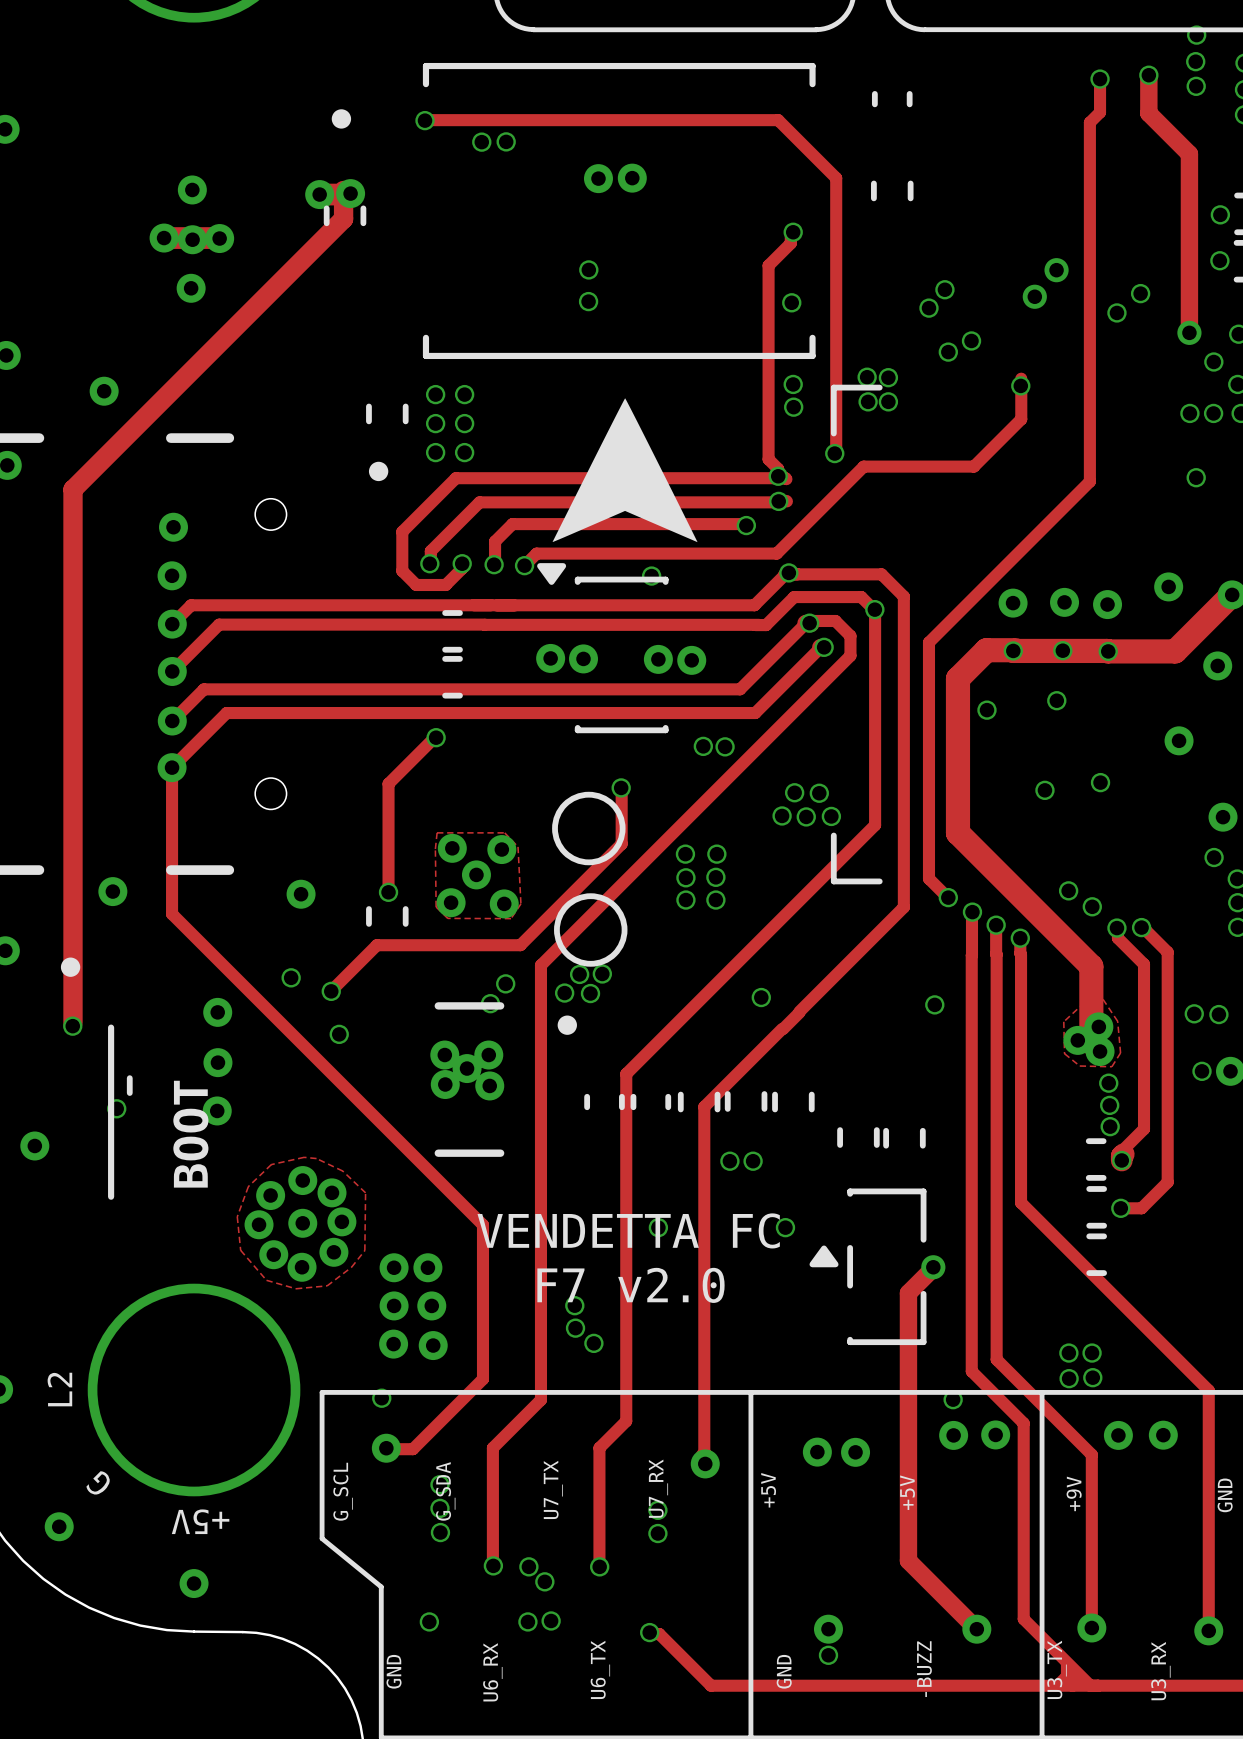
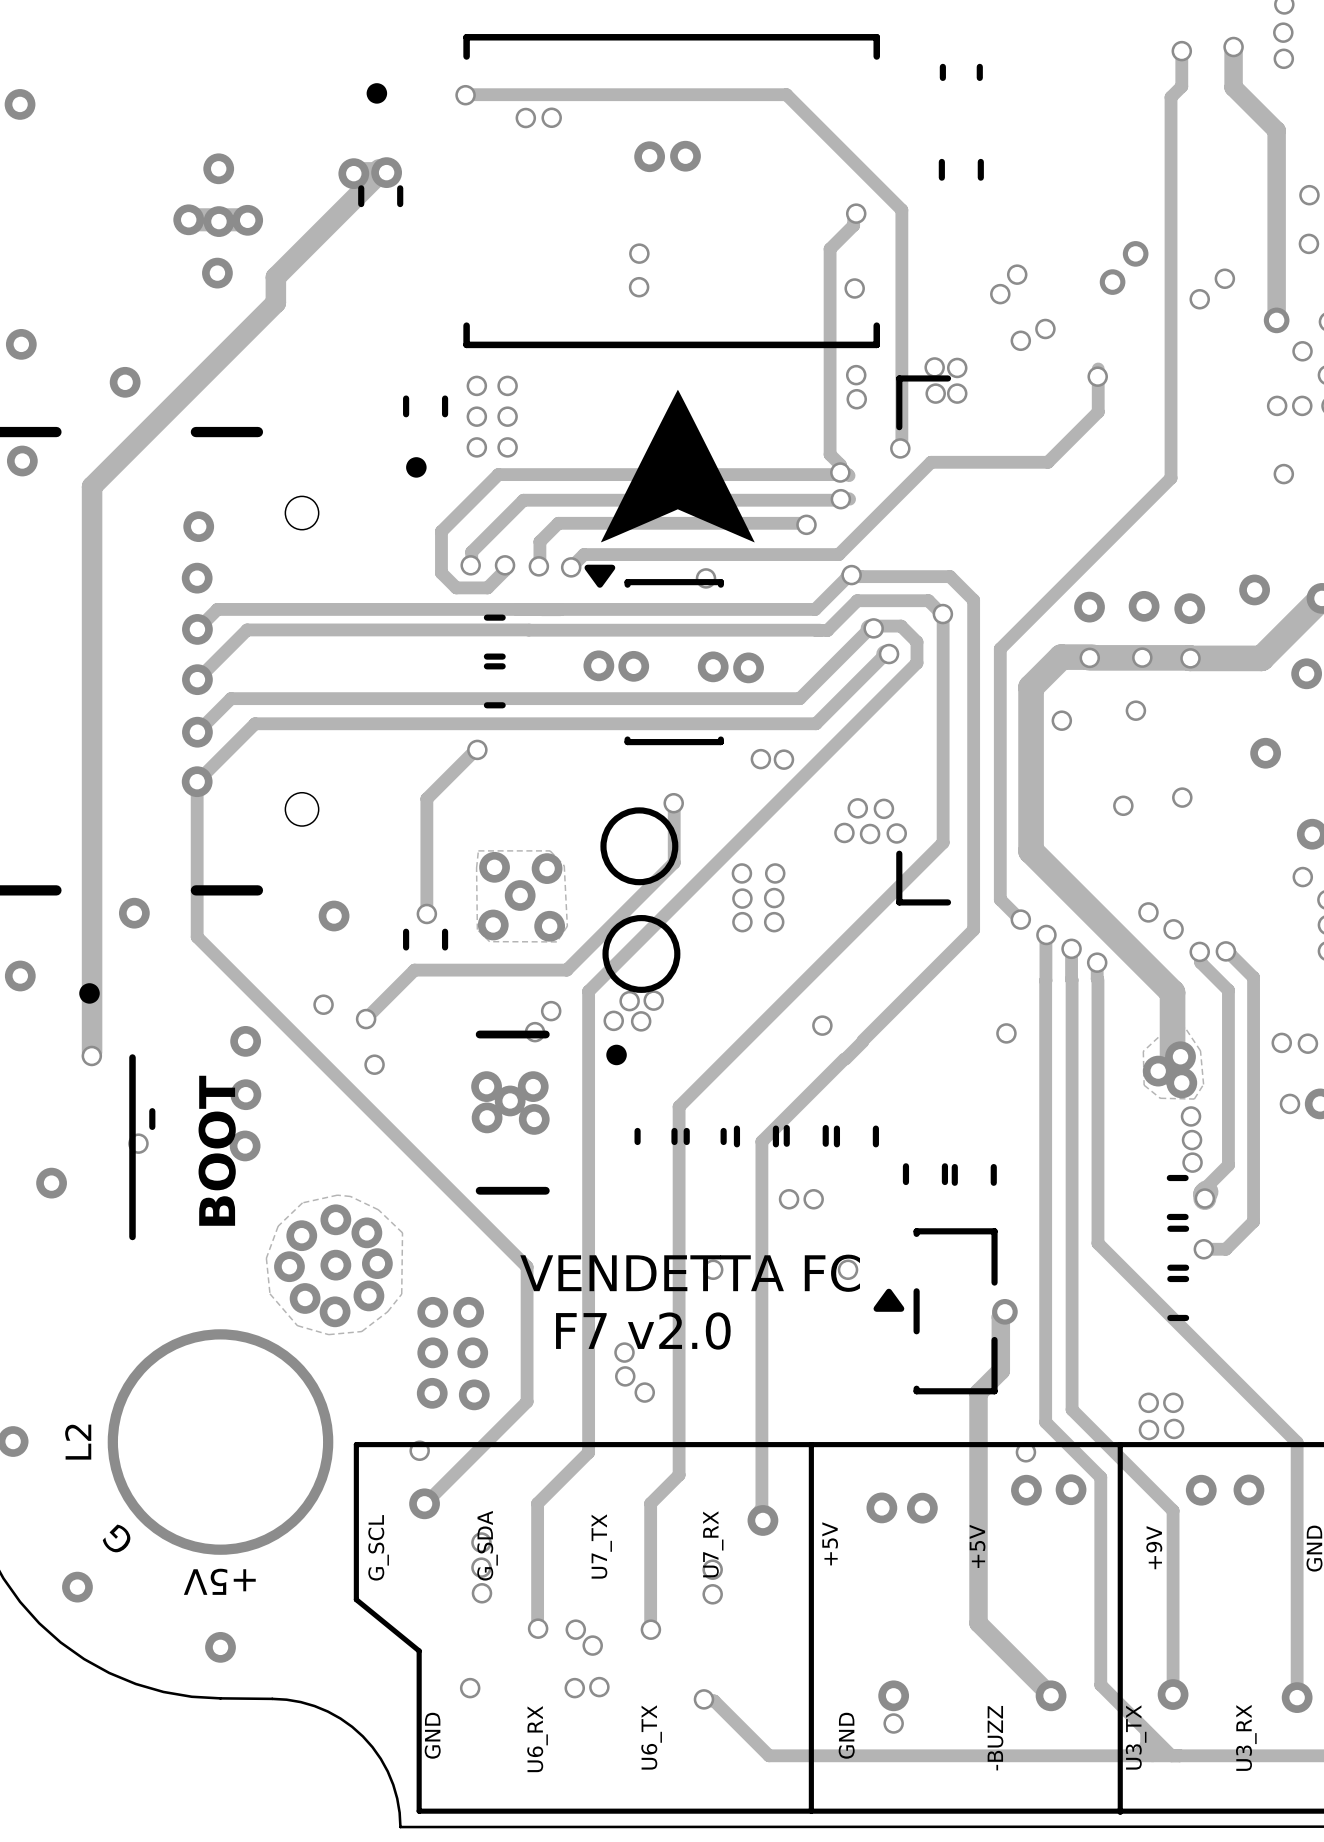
track: (727, 120) (778, 120) (836, 178) (836, 228) -> (786, 94) (901, 210)
track: (343, 194) (343, 218) (246, 316) -> (379, 173) (275, 277) (275, 302)
track: (929, 1272) (908, 1293) (908, 1343) -> (1000, 1316) (1000, 1370) (978, 1393)
track: (482, 1352) (482, 1379) (412, 1449) (385, 1449) -> (527, 1401) (424, 1504)

